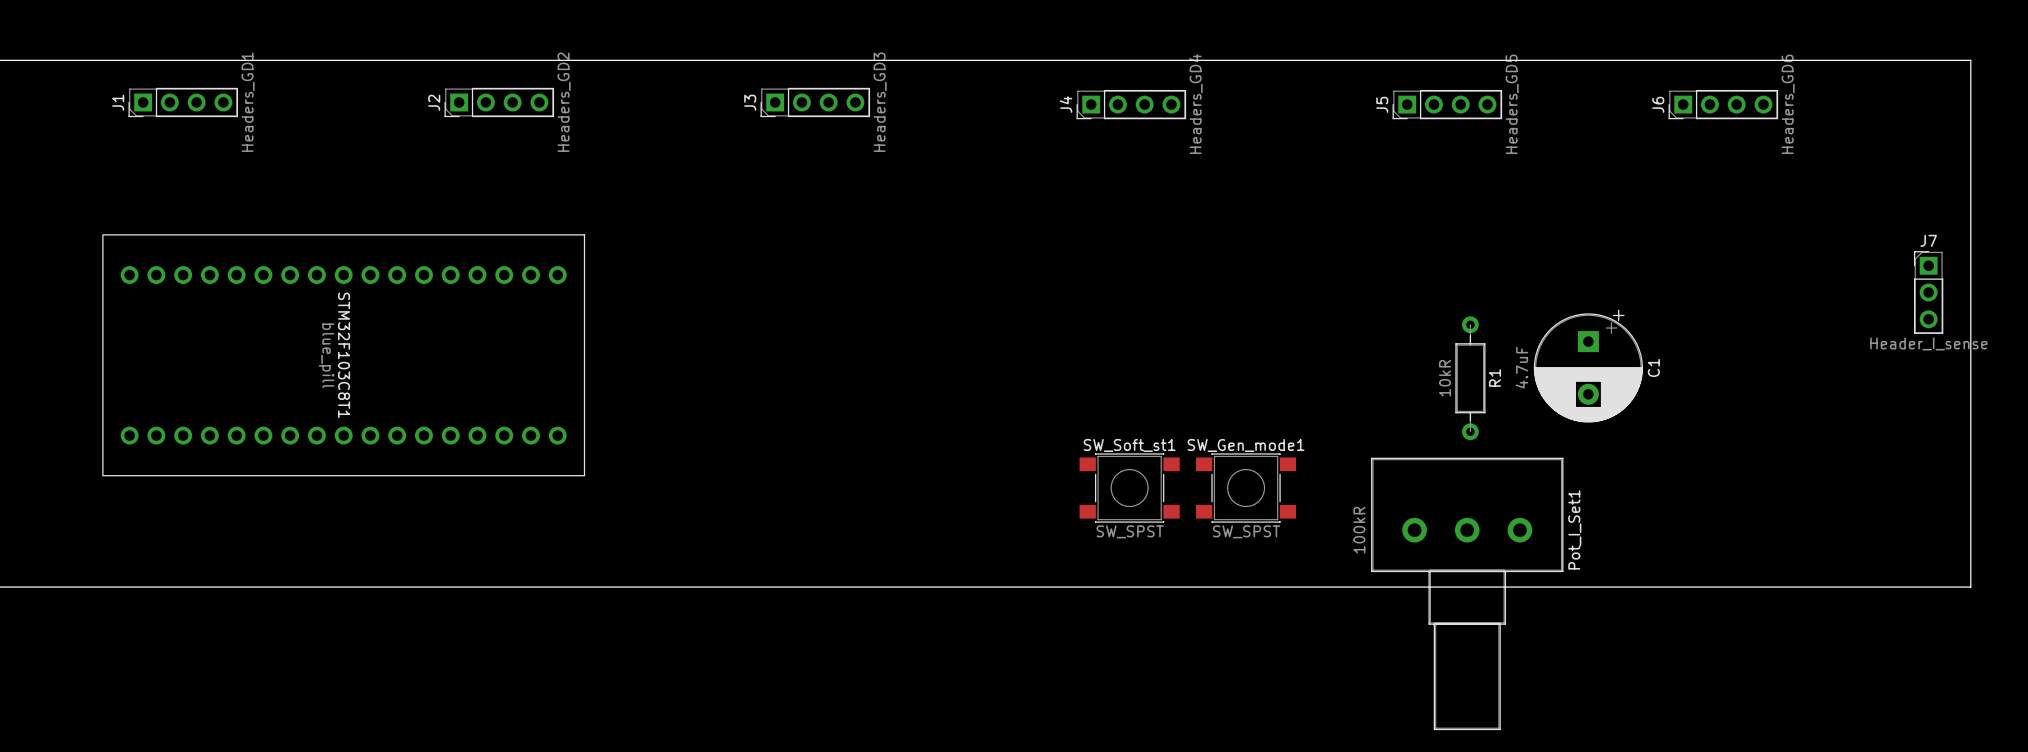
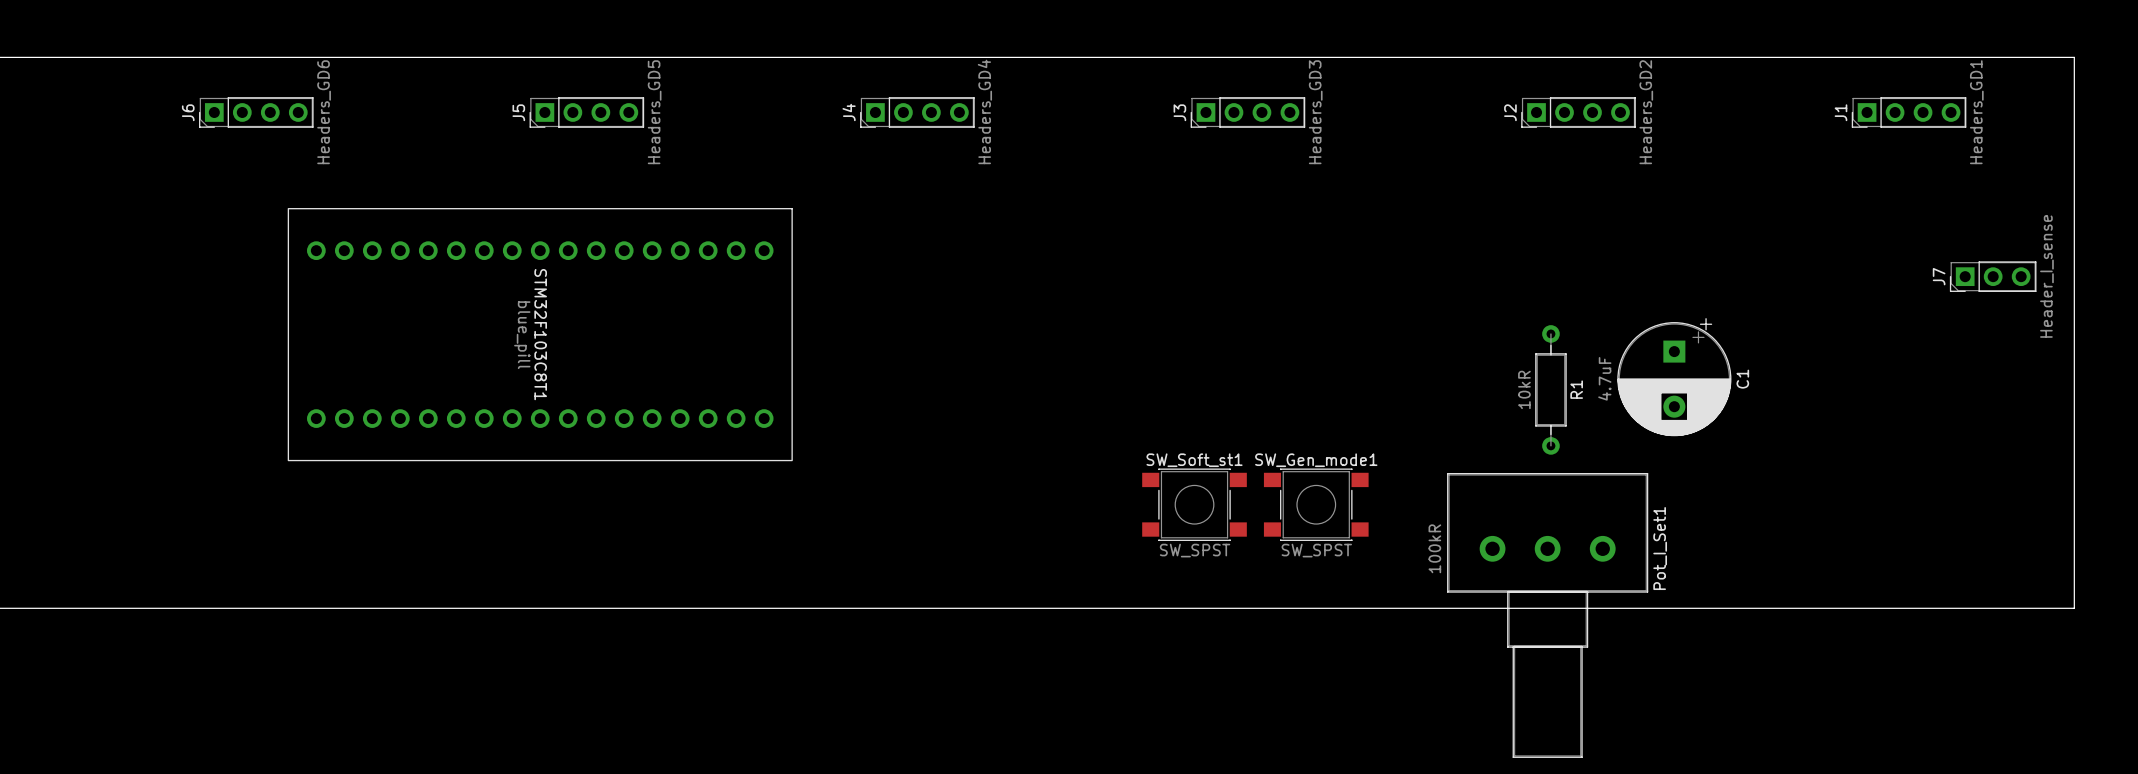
J1 position: (183, 102) -> (1909, 112)
J2 position: (499, 102) -> (1578, 112)
J3 position: (815, 102) -> (1247, 112)
J4 position: (1131, 104) -> (917, 112)
J5 position: (1447, 104) -> (586, 112)
J6 position: (1723, 104) -> (256, 112)
J7 rotation: 0° (1928, 292) -> 90° counterclockwise (1993, 276)
STM32F103C8T1 position: (343, 355) -> (540, 334)

